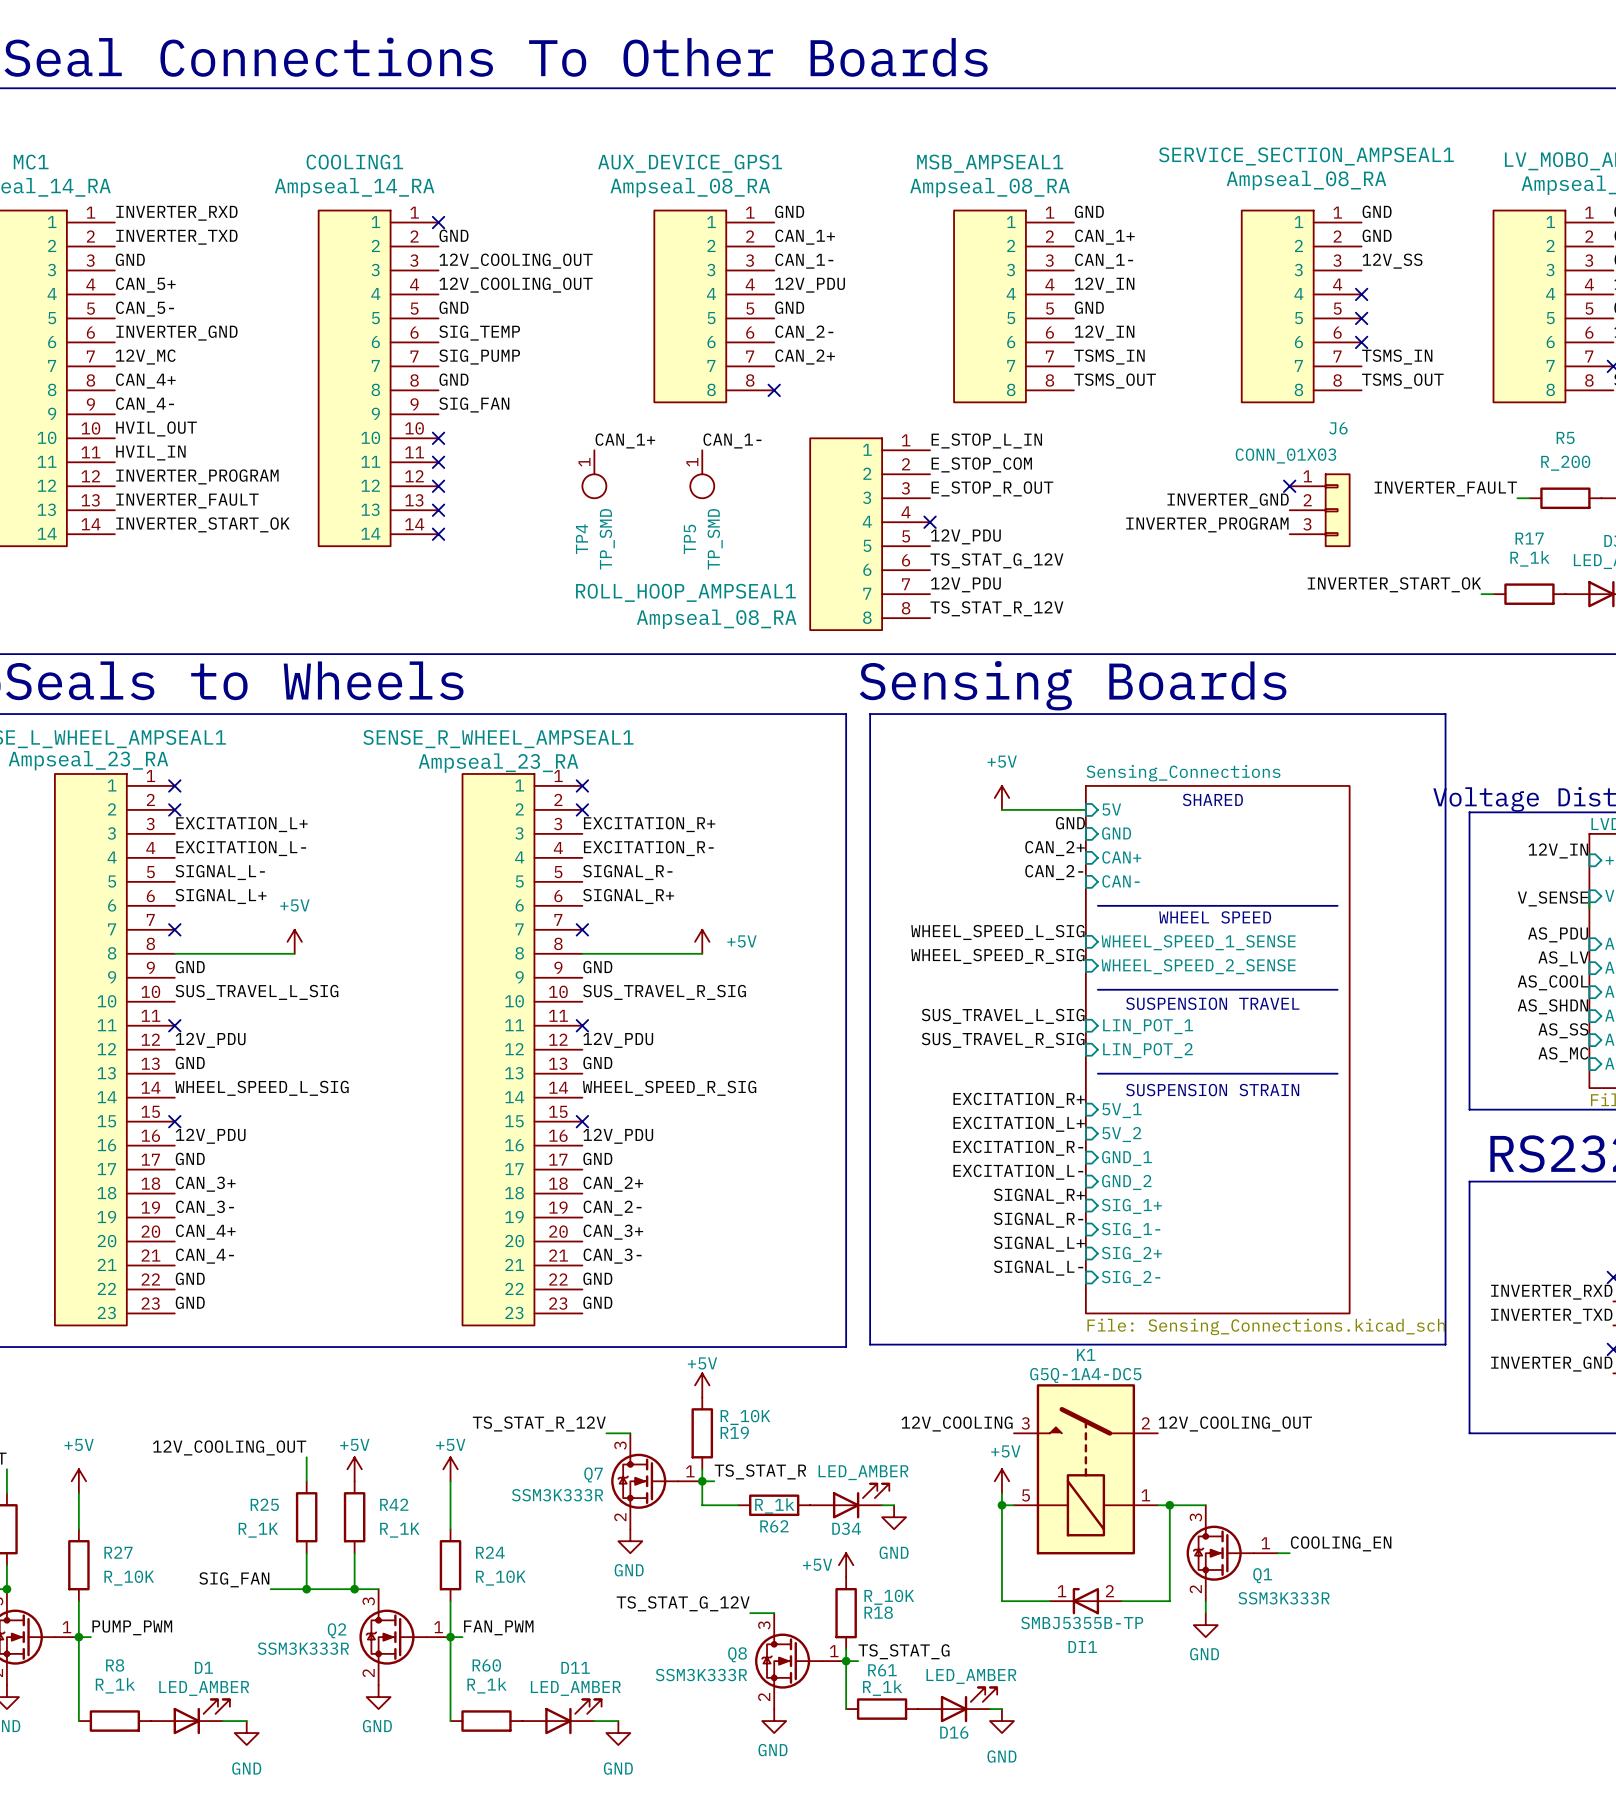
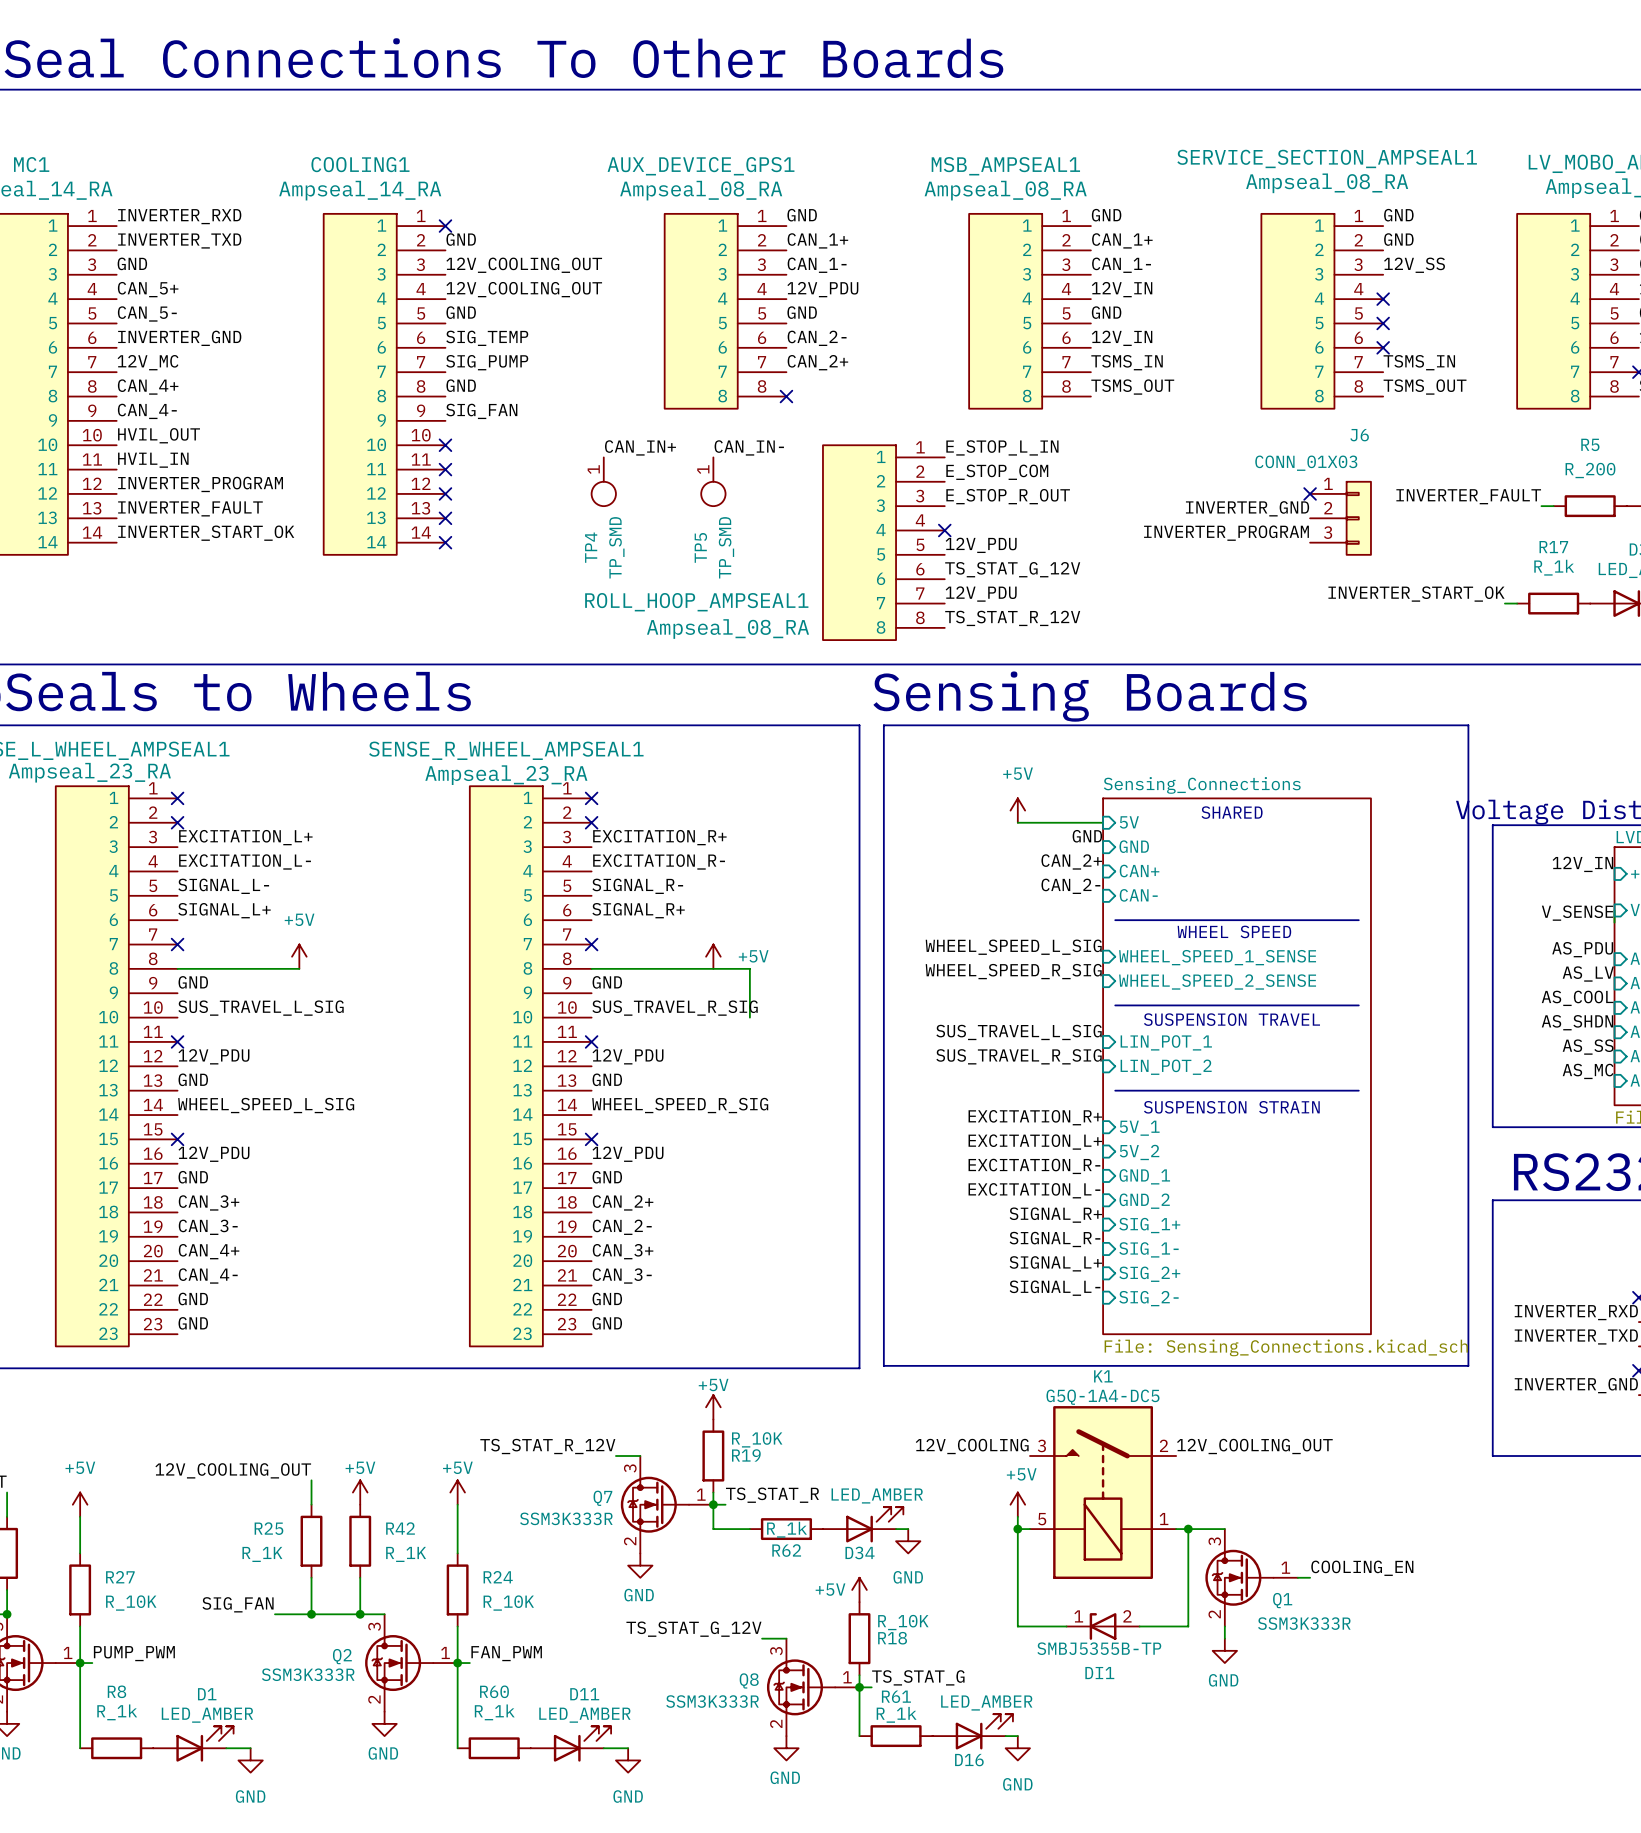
label: CAN_1+ (625, 440) -> CAN_IN+ (640, 447)
label: CAN_1- (732, 440) -> CAN_IN- (749, 447)
wire: none -> (713, 968) (749, 968) (749, 1017)

